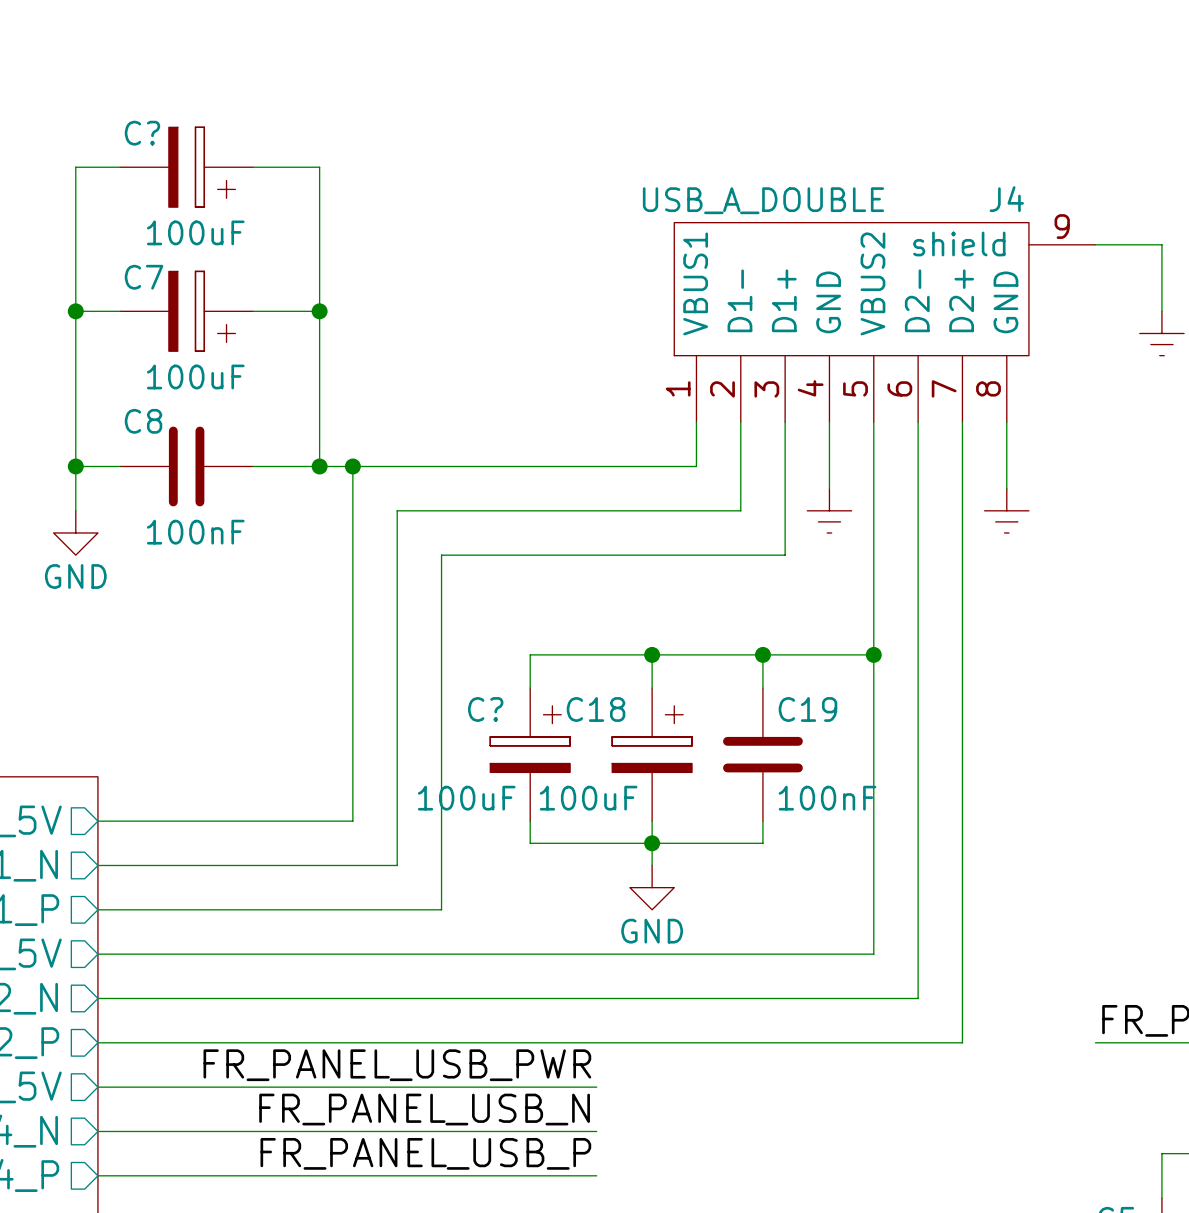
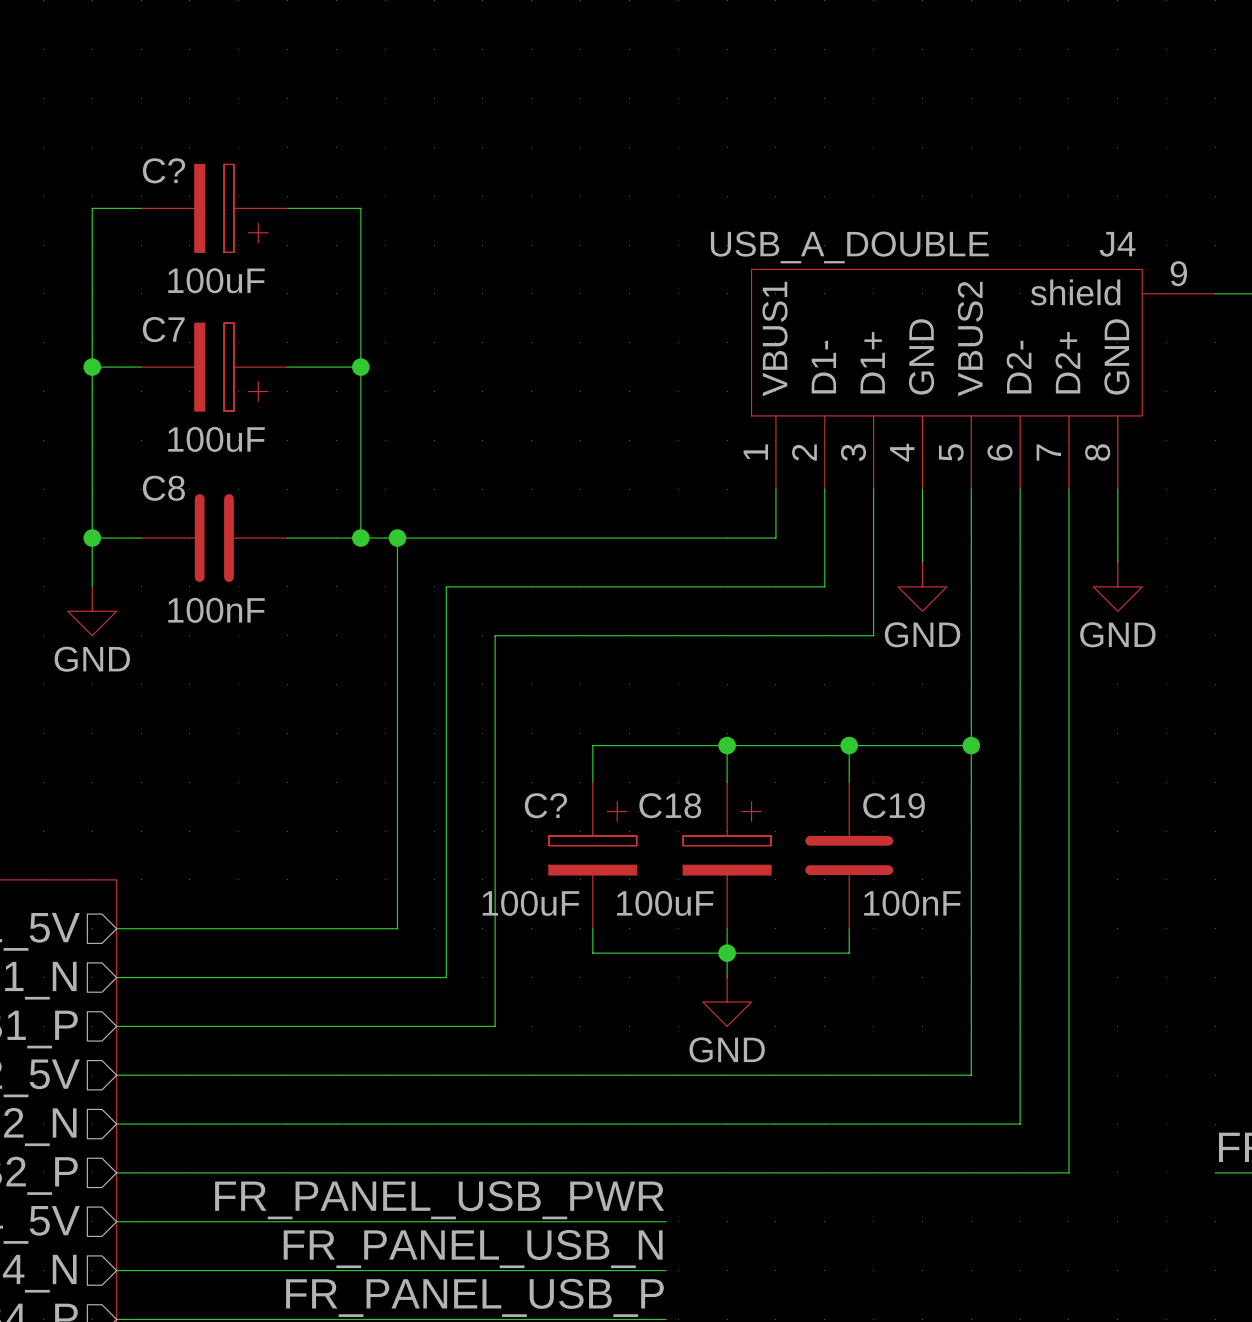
power symbol shape: [807, 488, 852, 533] -> [898, 562, 947, 612]
power symbol shape: [984, 488, 1029, 533] -> [1093, 562, 1143, 612]
power symbol text: none -> GND (922, 634)
power symbol text: none -> GND (1117, 634)

